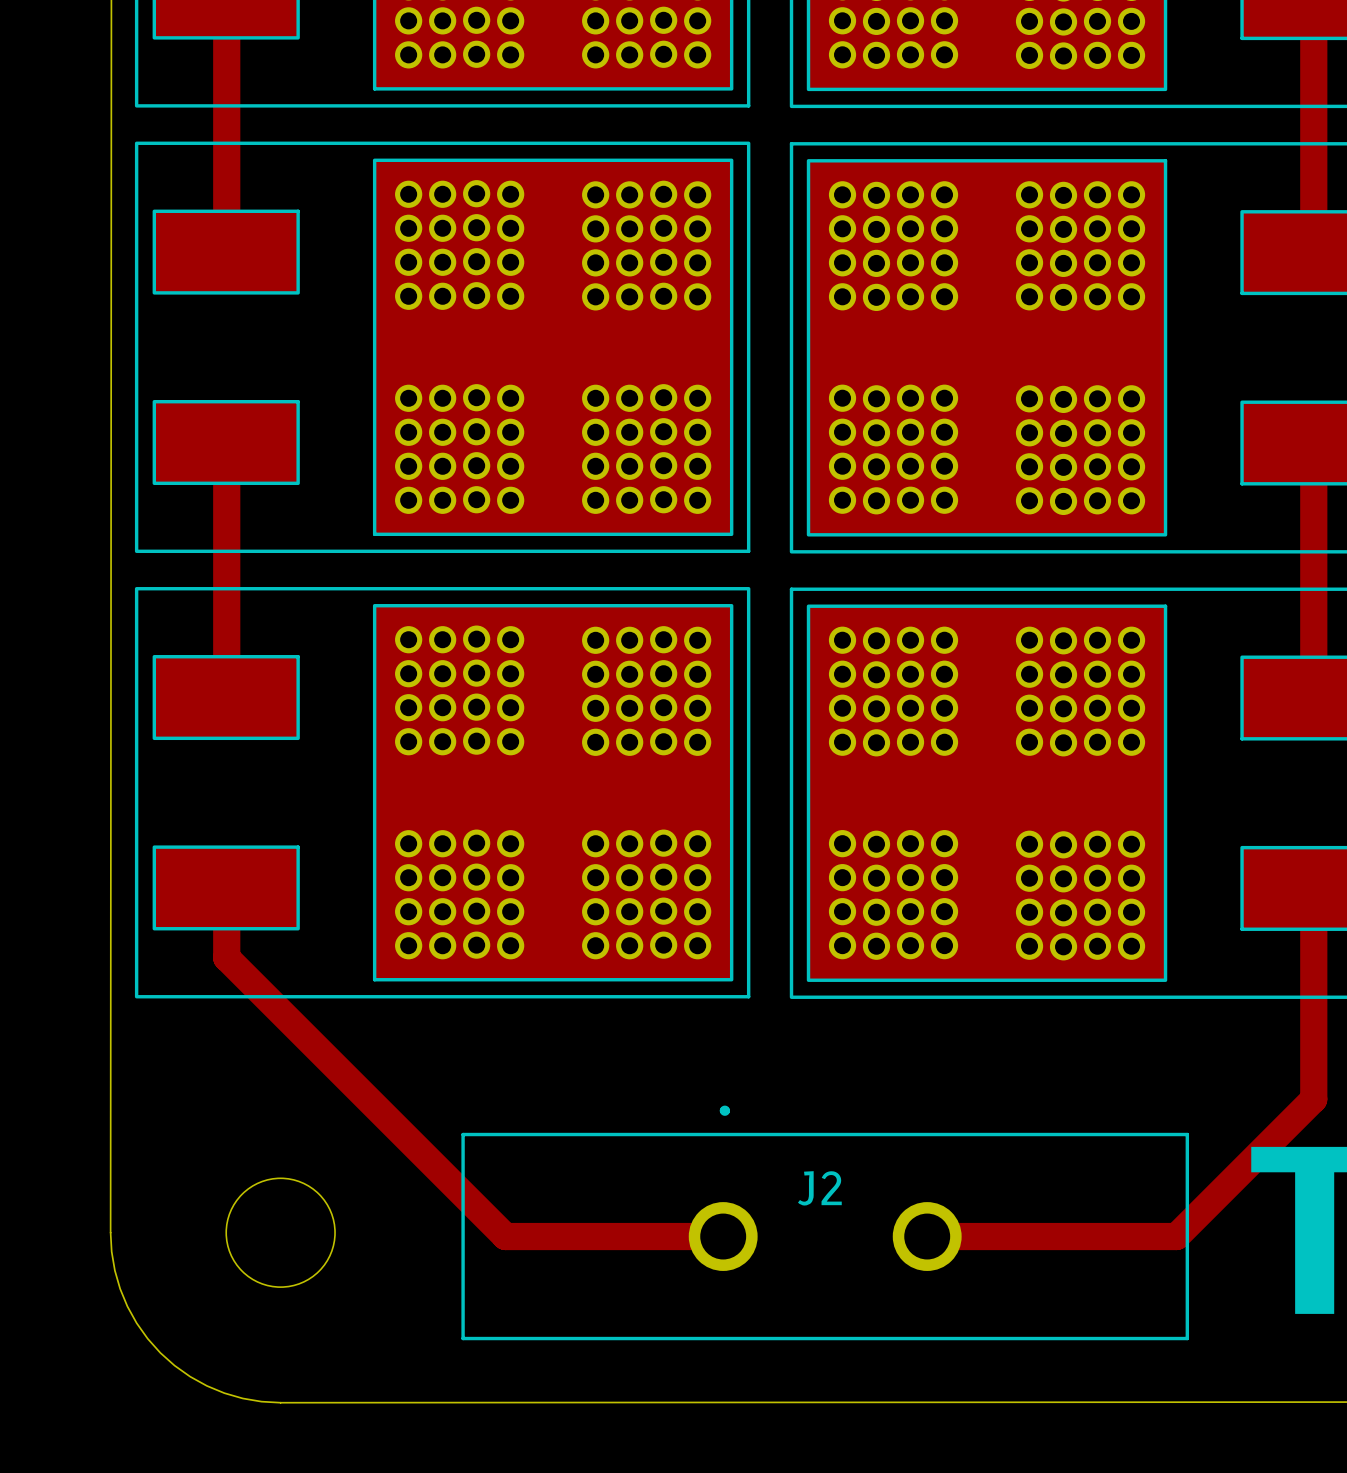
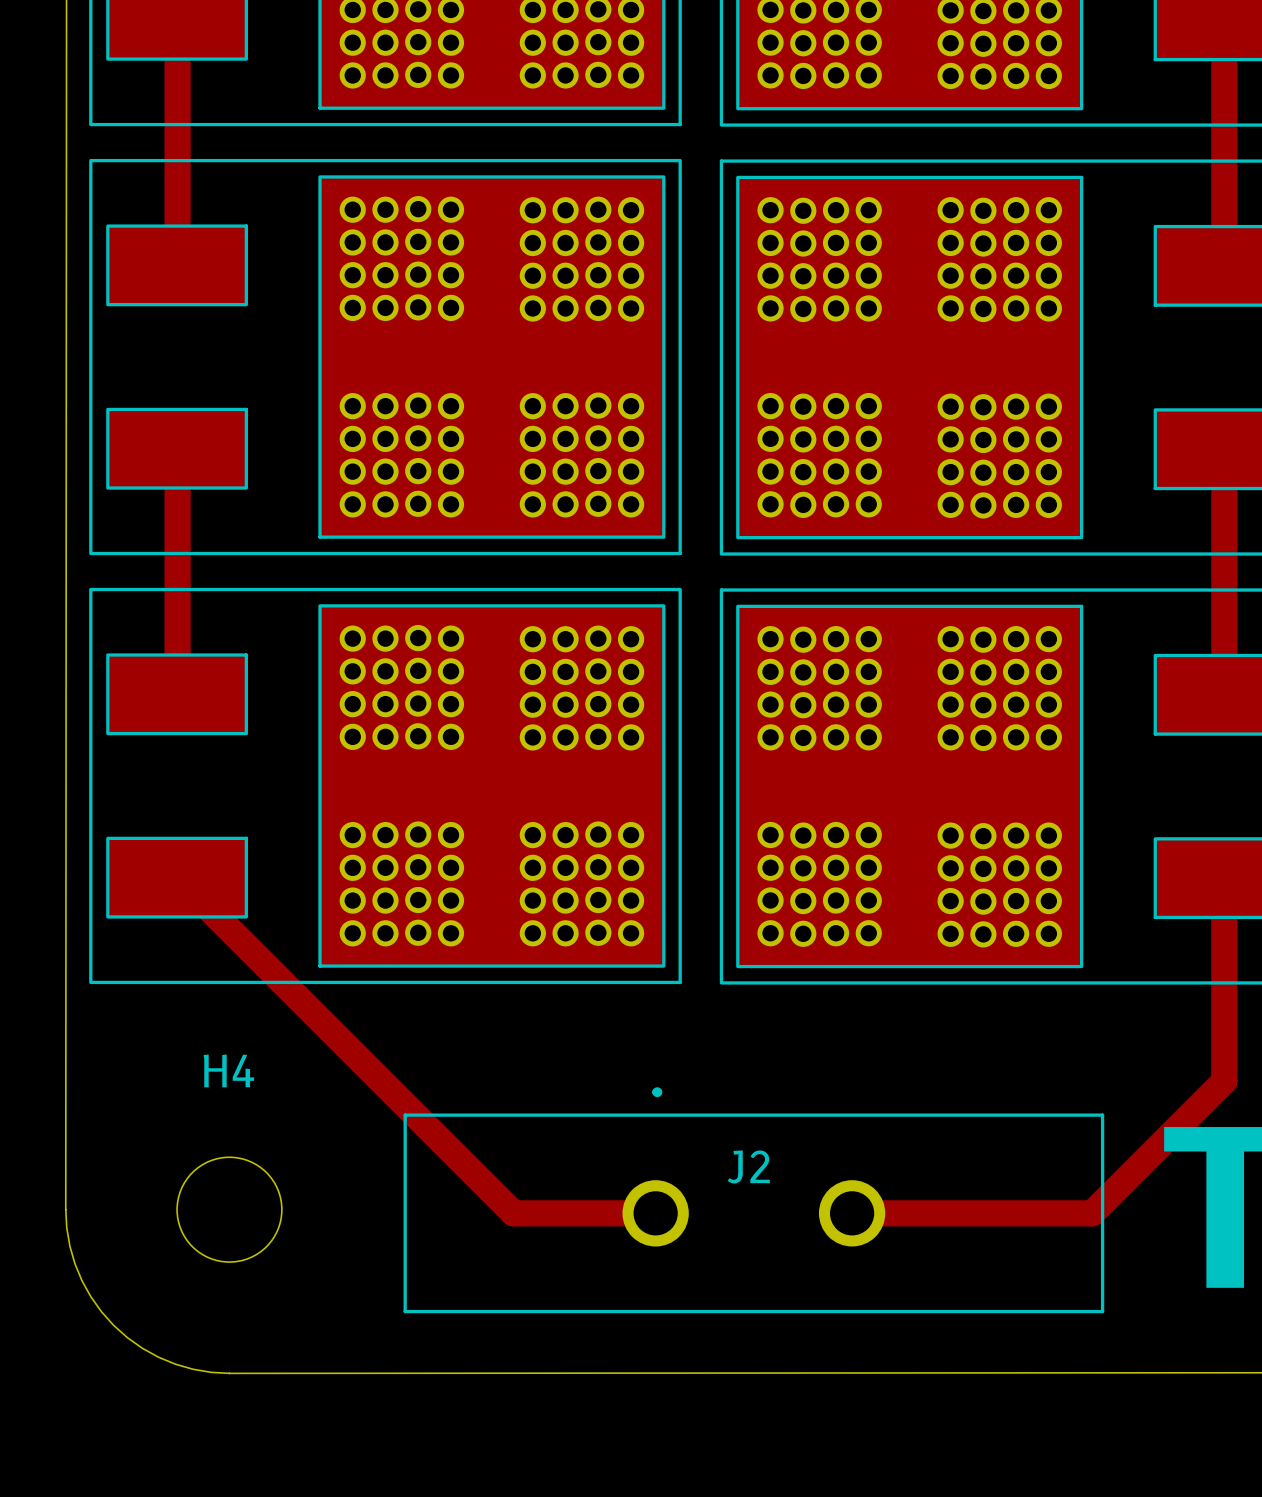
track: (226, 887) (226, 957) (505, 1236) (575, 1236) -> (177, 877) (513, 1213)
H4 name: none -> H4 (228, 1070)

